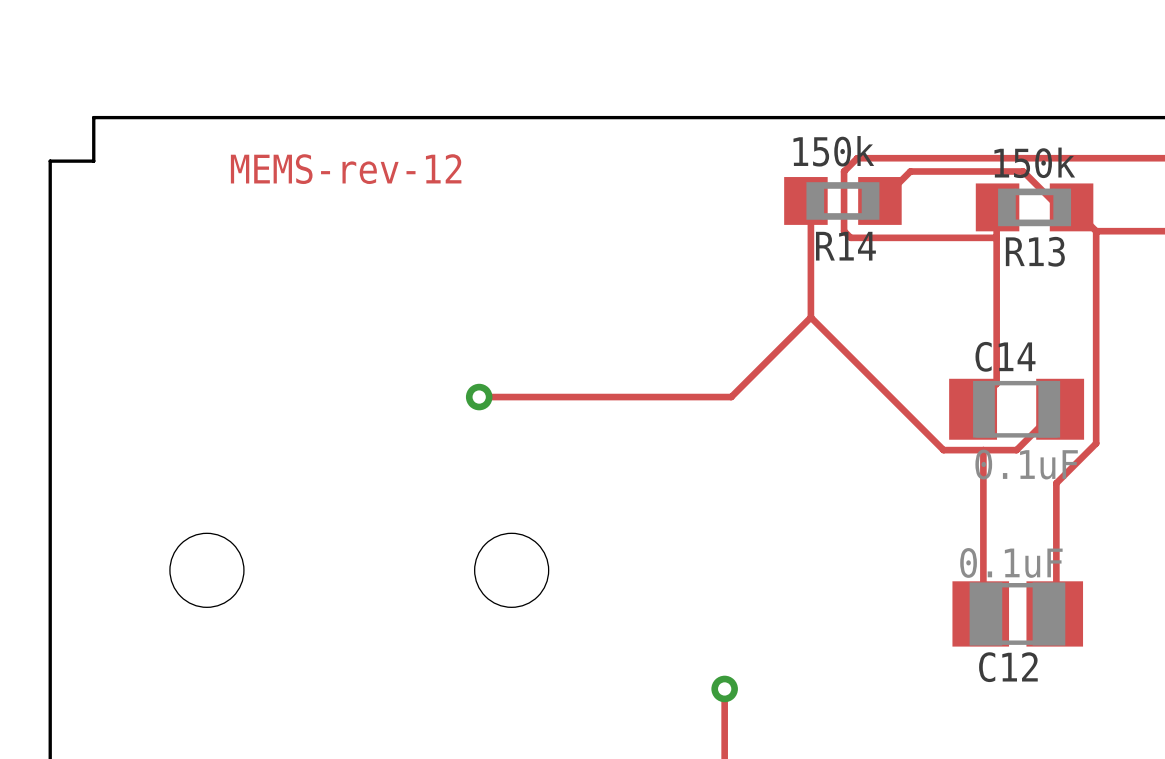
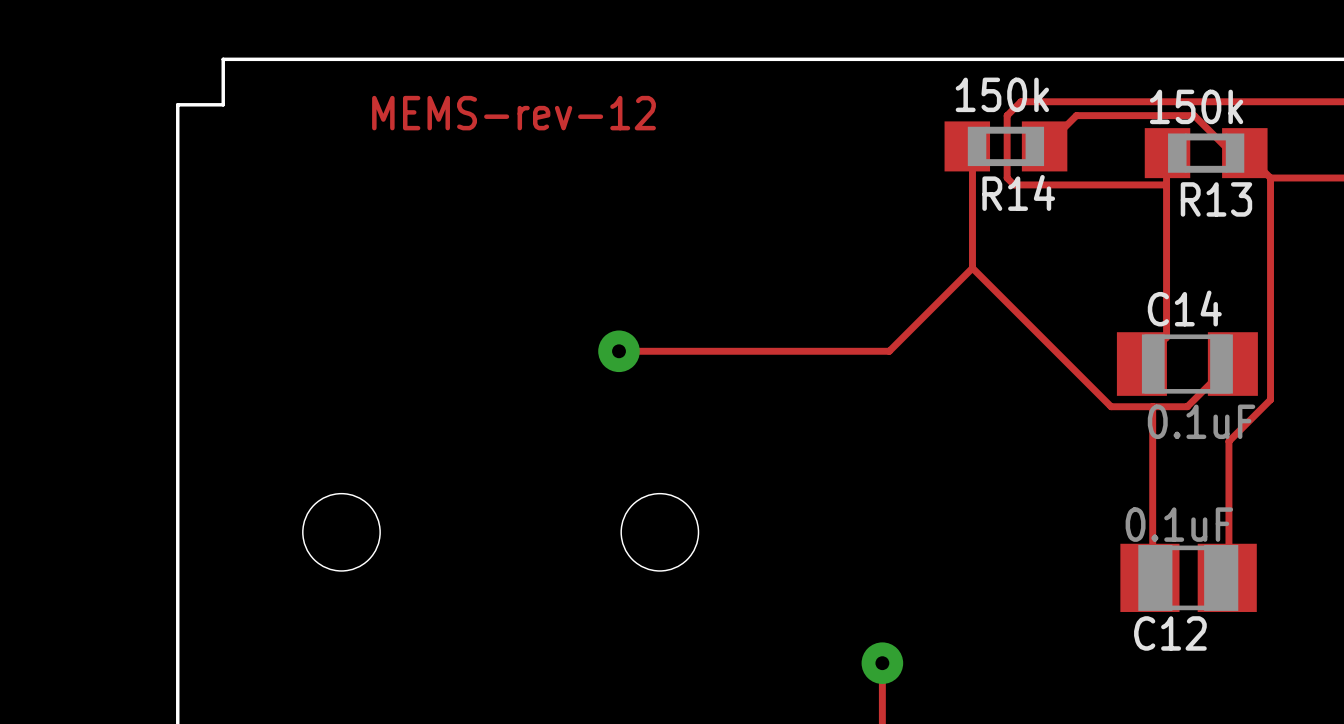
via size: [465, 383, 493, 411] -> [598, 330, 640, 373]
via size: [711, 675, 738, 703] -> [861, 642, 904, 684]

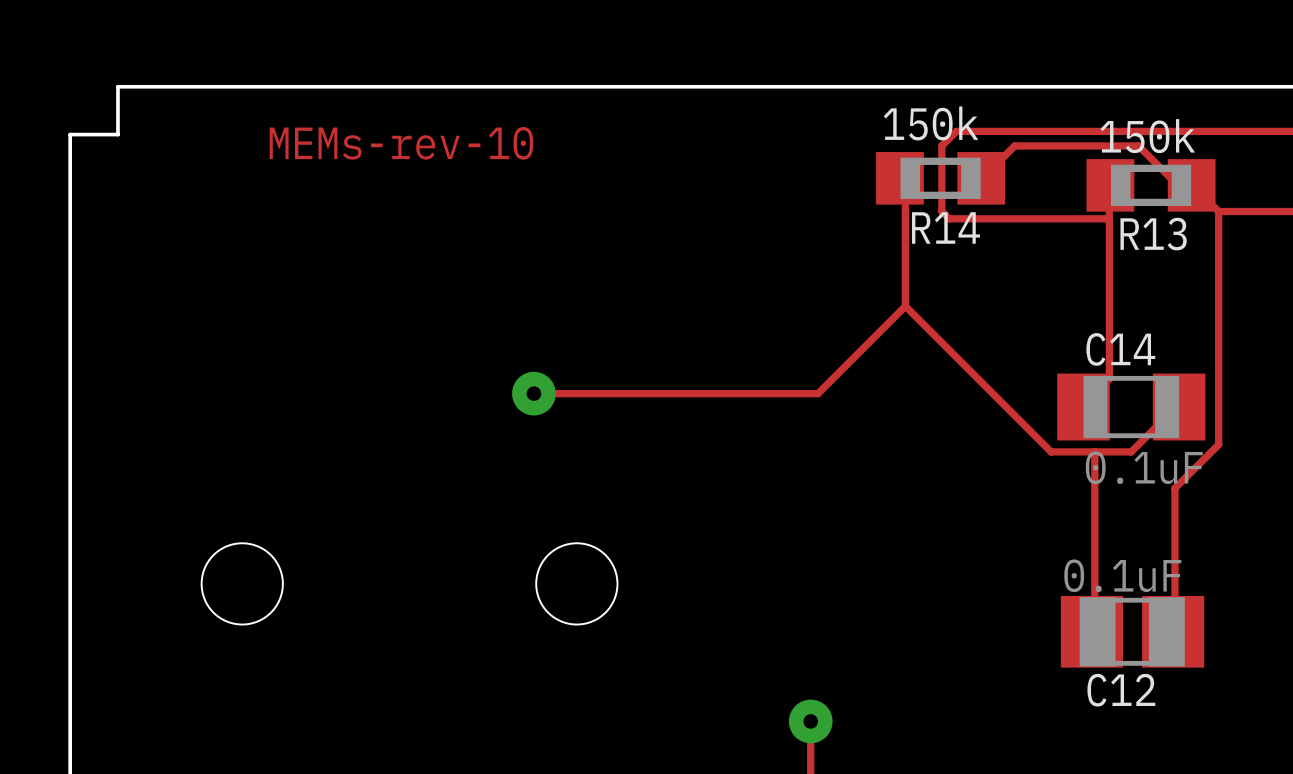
text: MEMS-rev-12 (514, 113) -> MEMs-rev-10 (401, 143)

